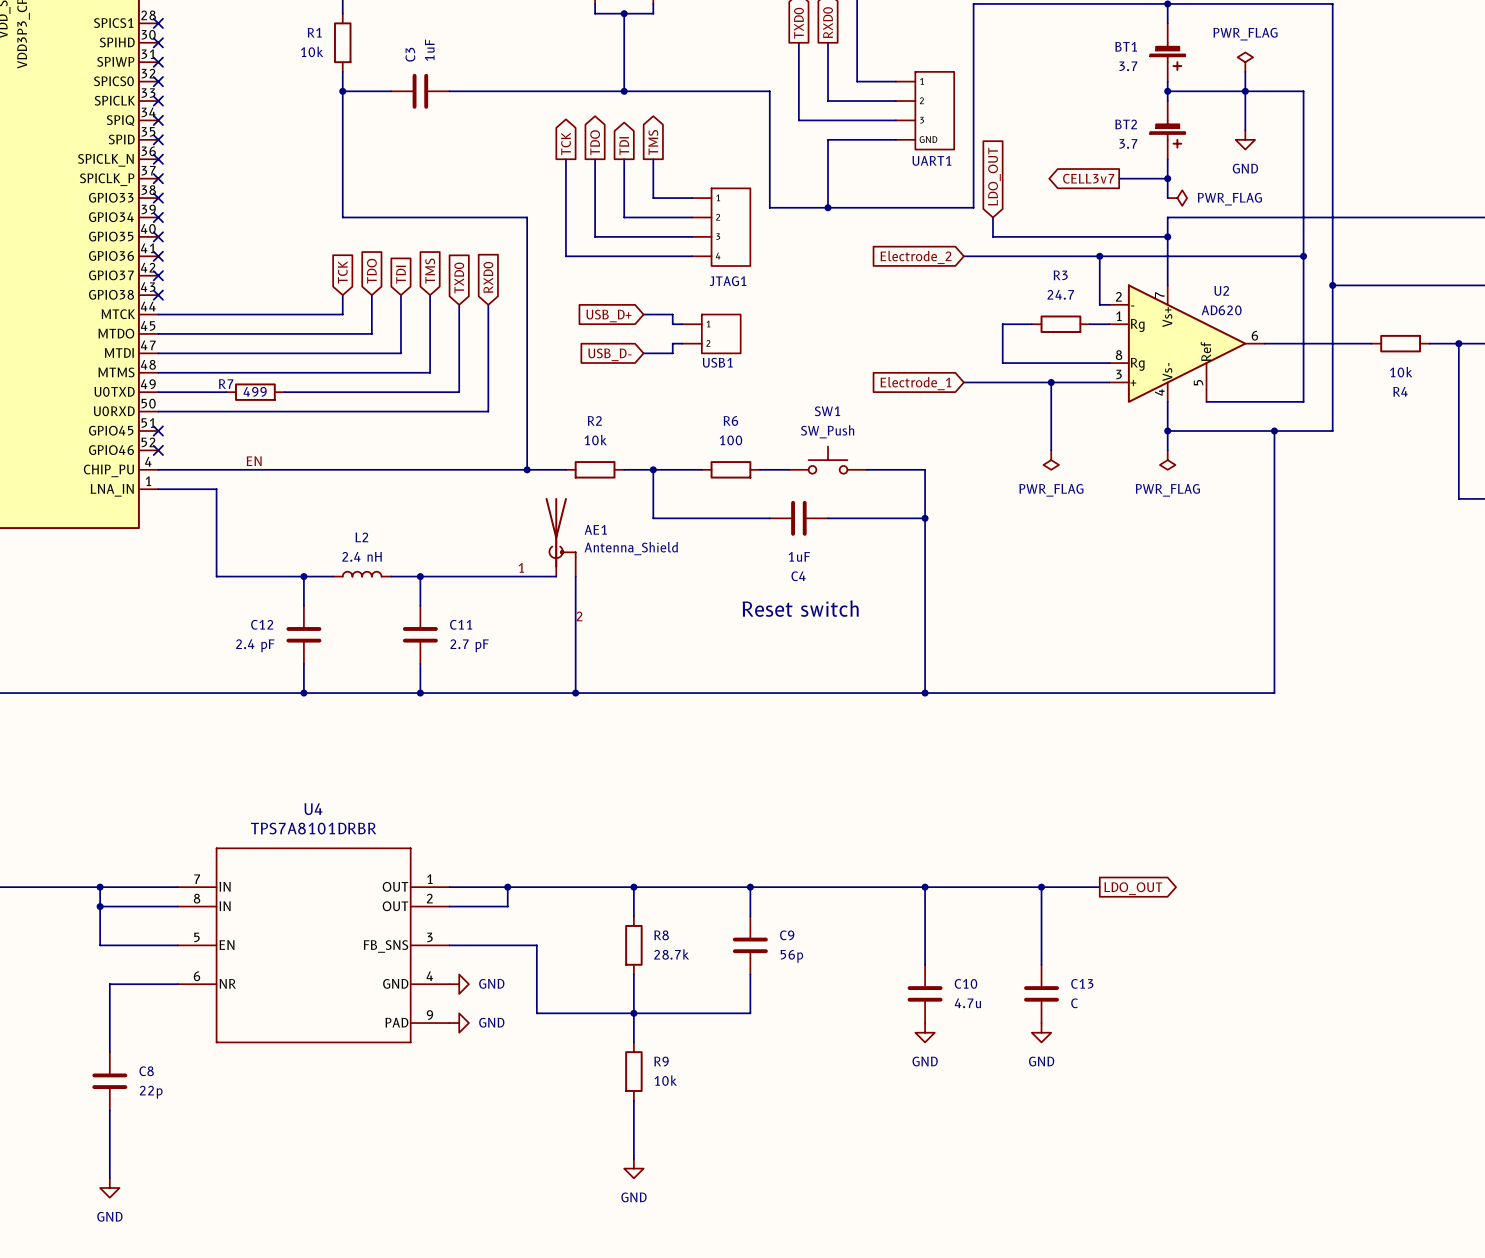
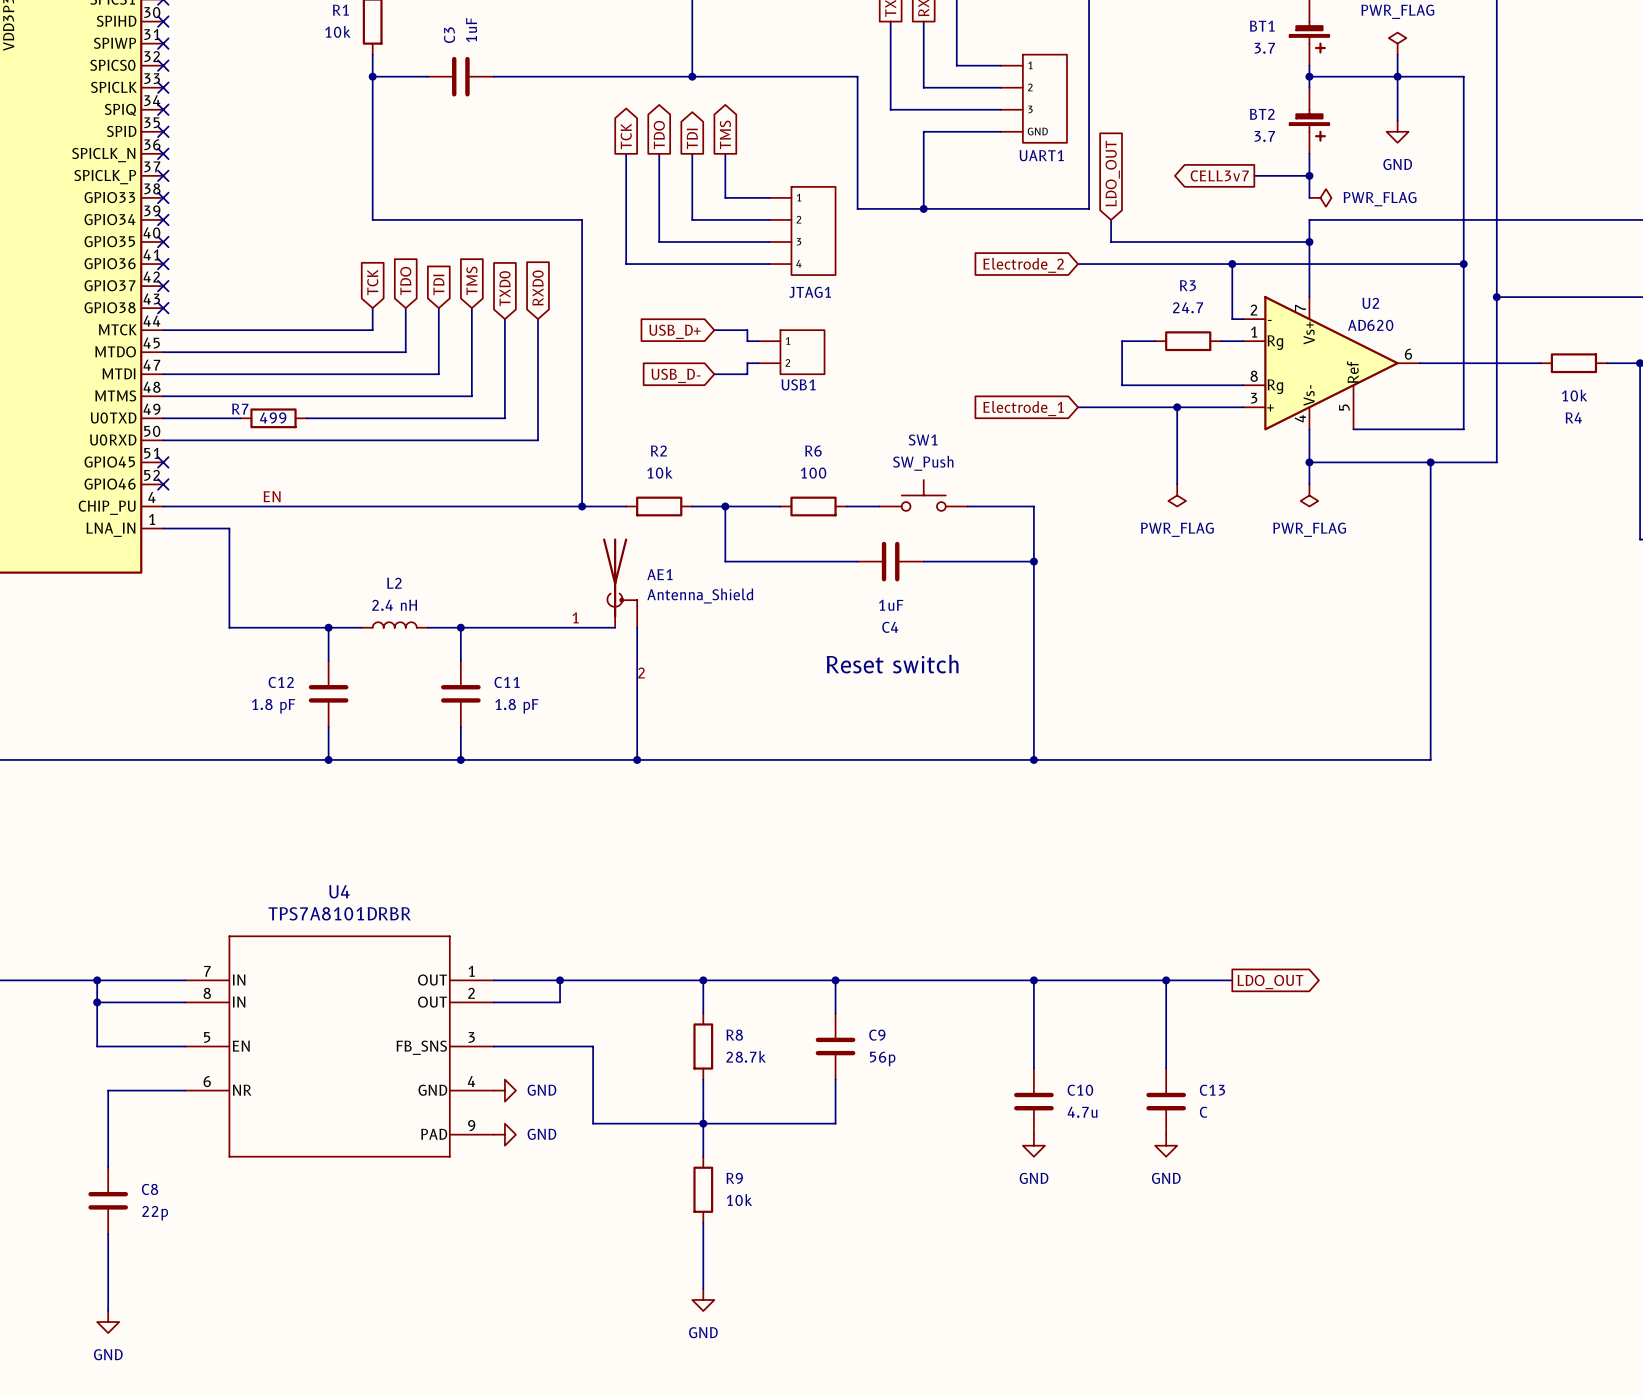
C12 value: 2.4 pF (255, 645) -> 1.8 pF (273, 706)
C11 value: 2.7 pF (469, 645) -> 1.8 pF (516, 706)

